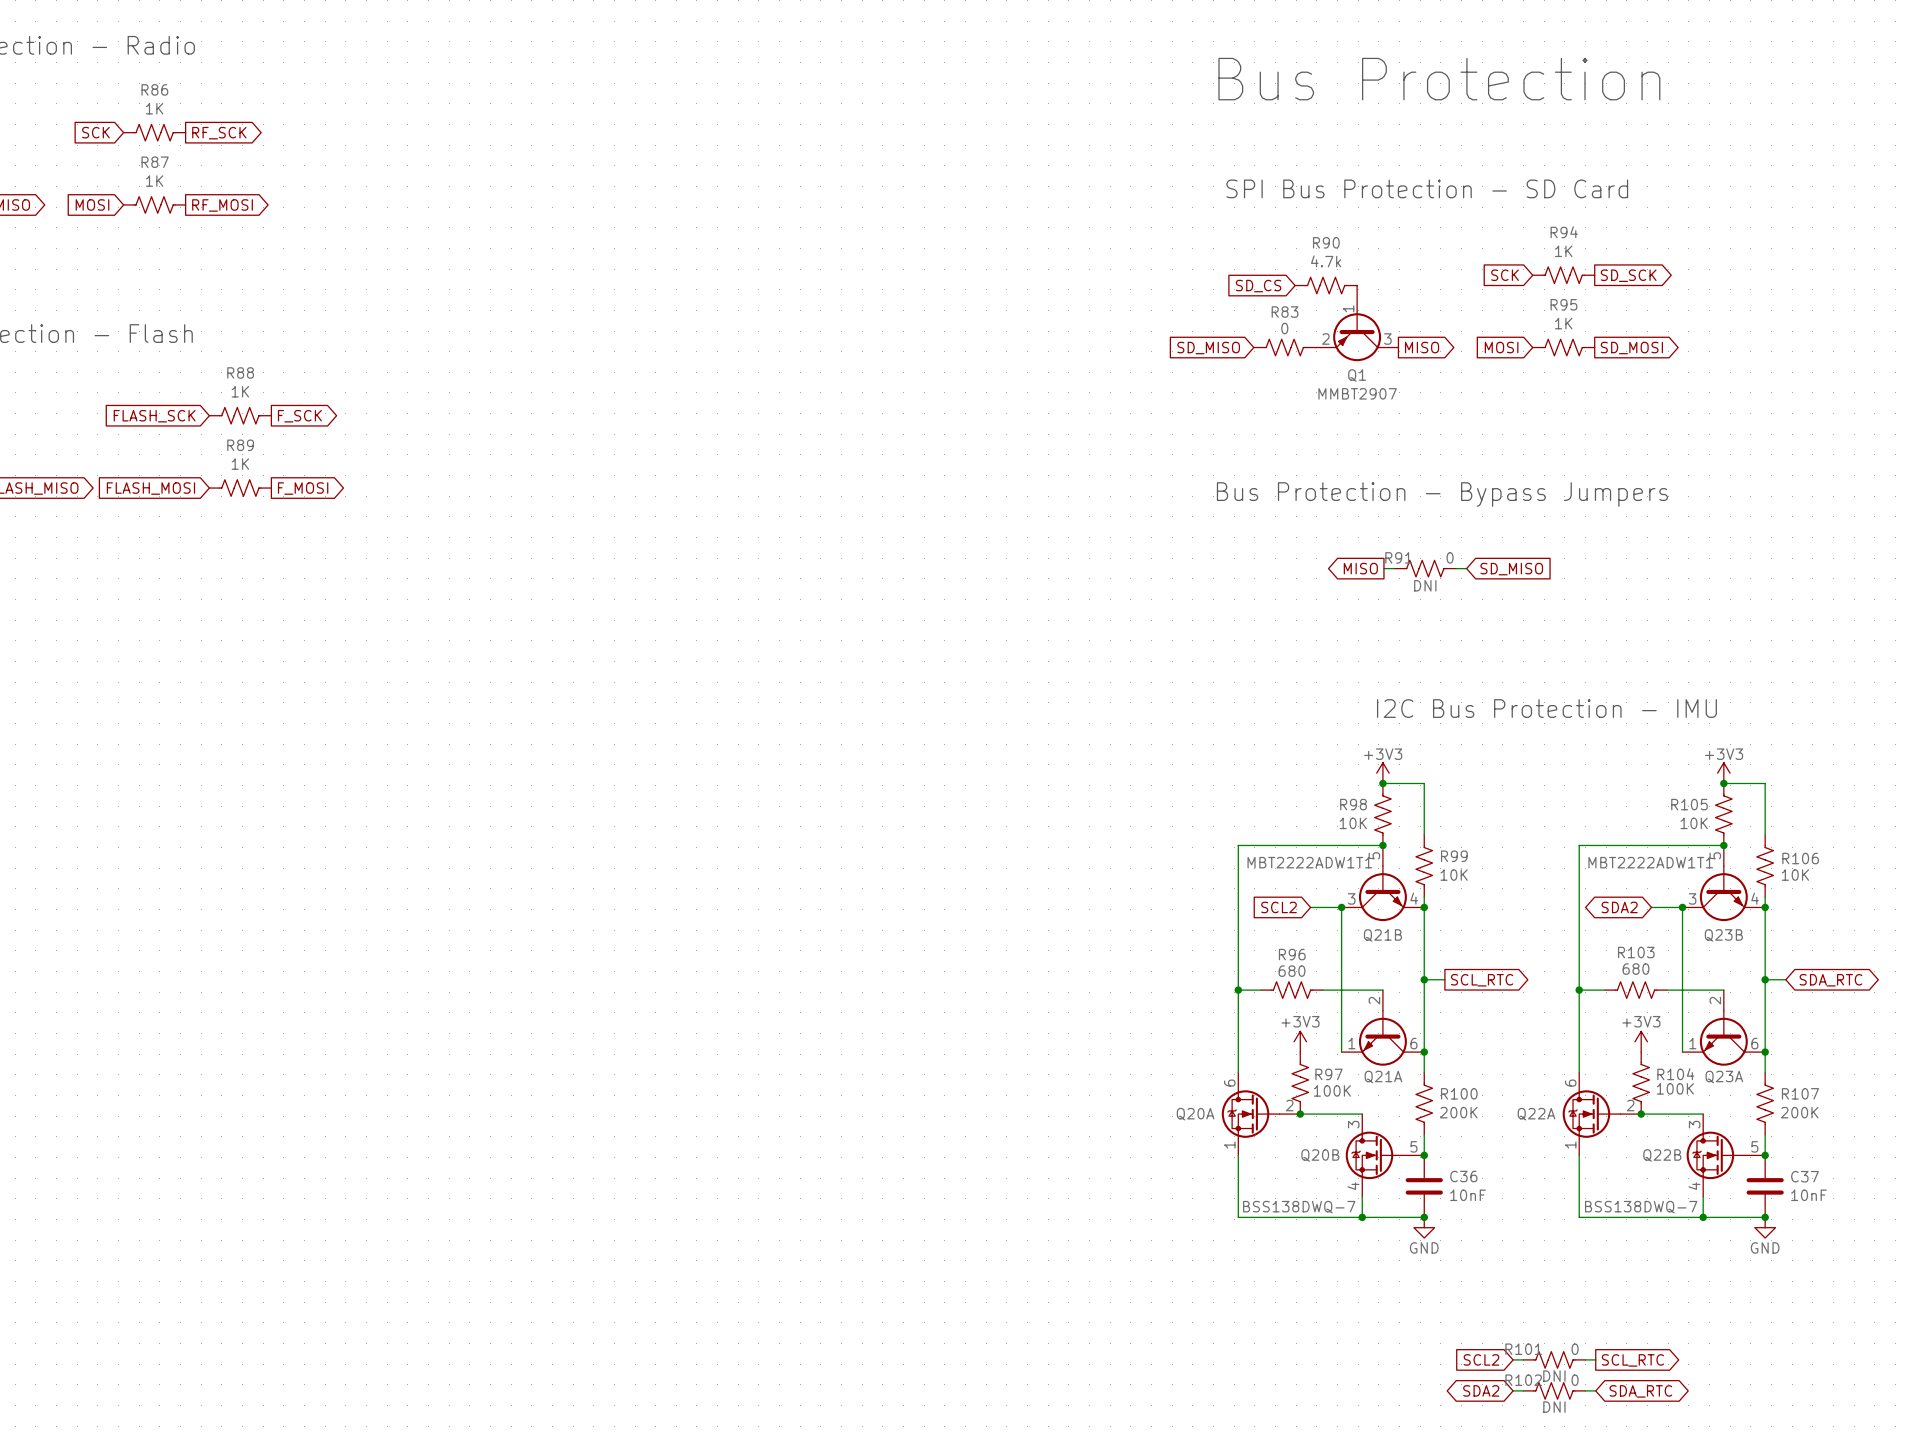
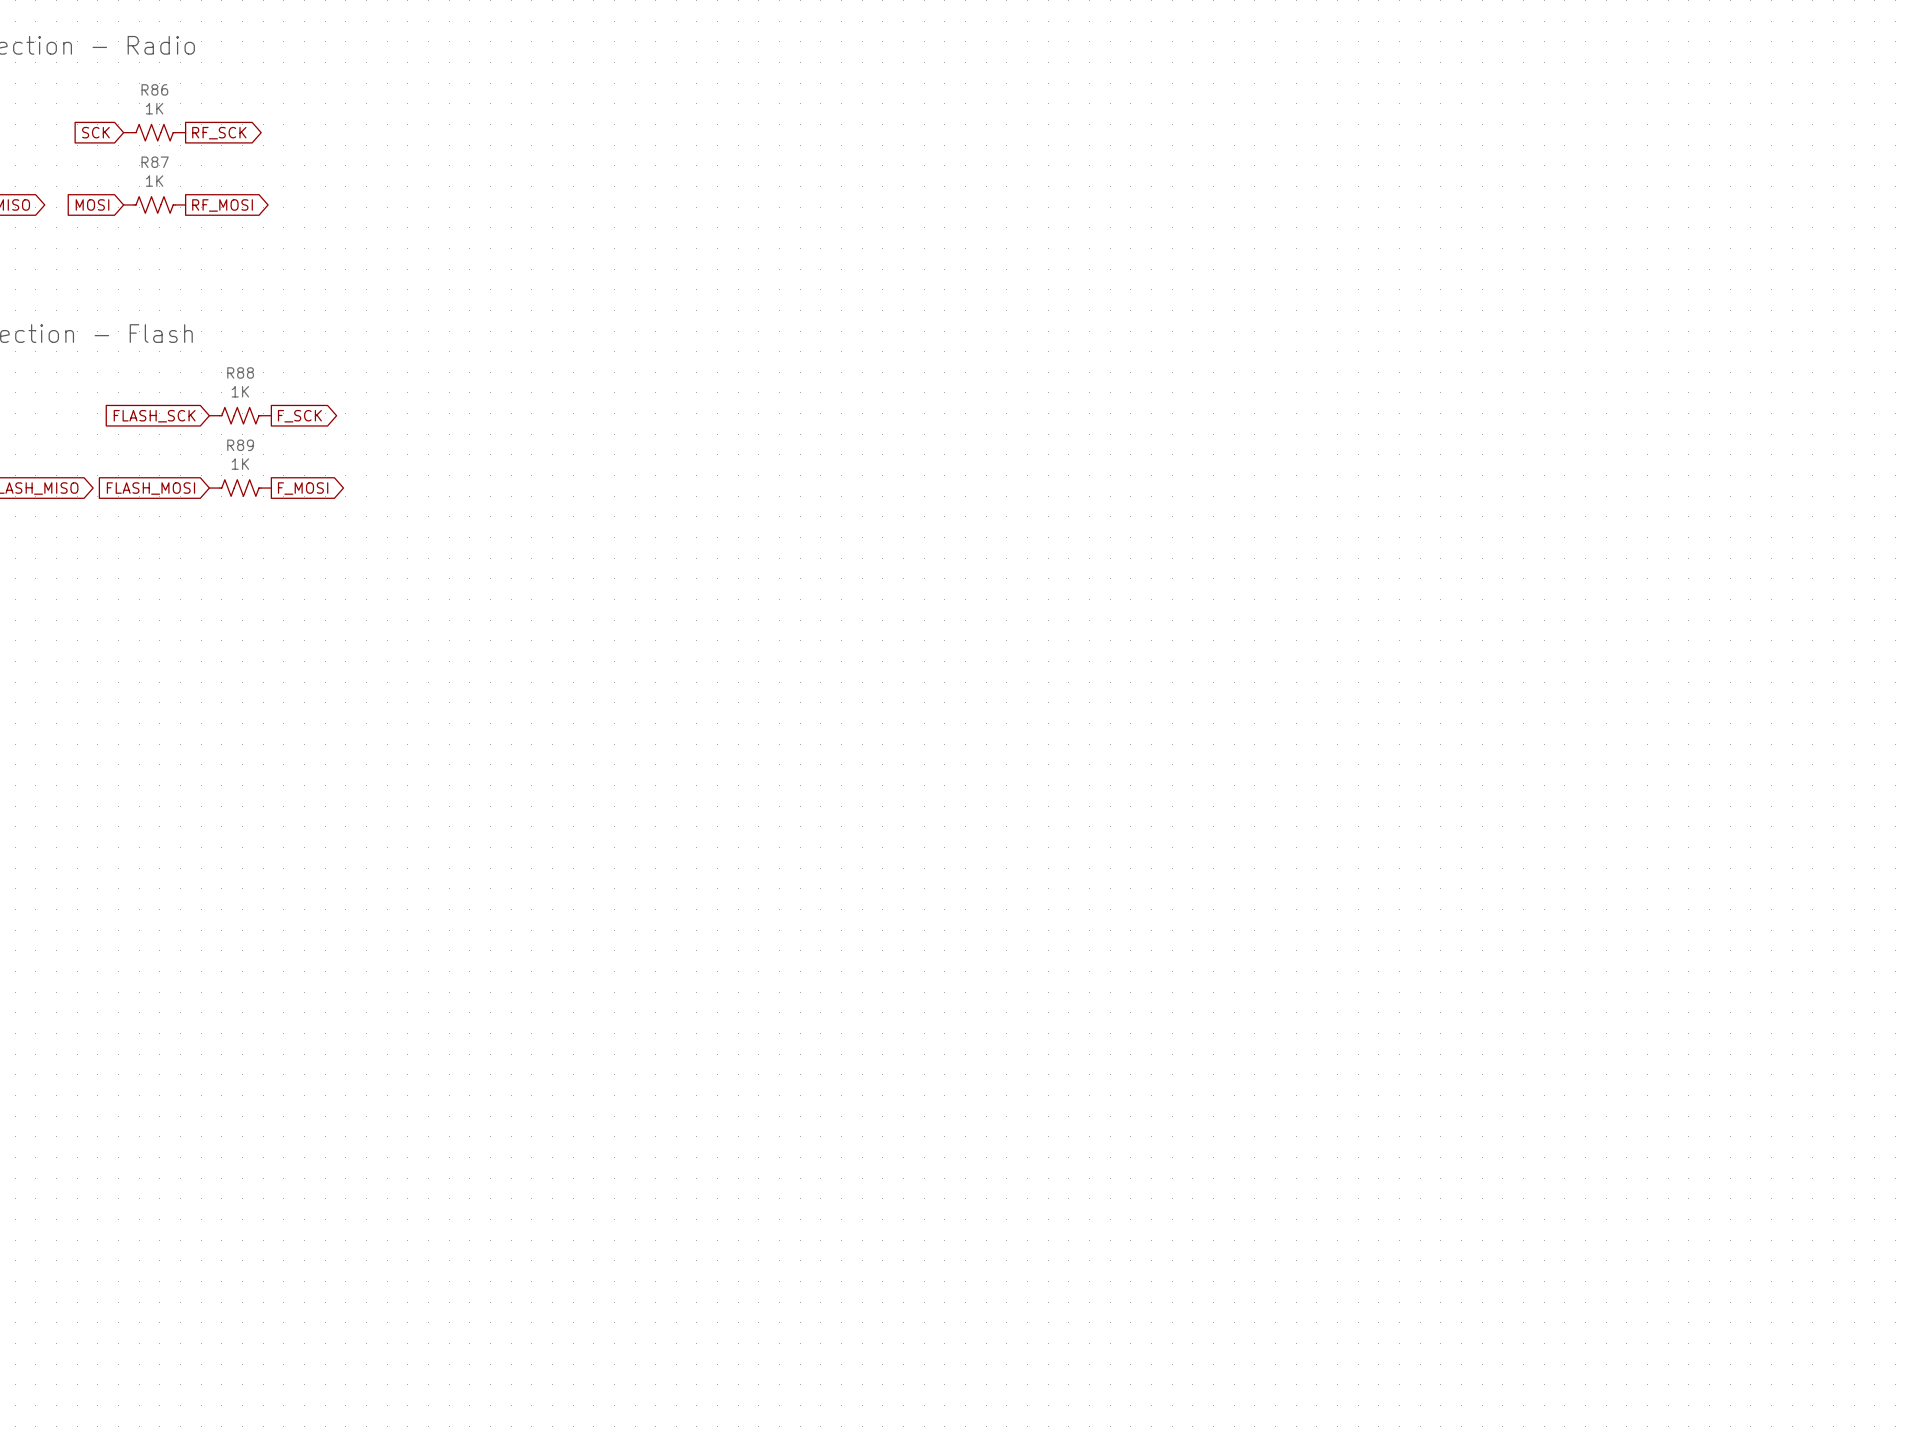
text: Bus Protection (1439, 79) -> none
text: SPI Bus Protection - SD Card (1427, 188) -> none
global label: SCK (1505, 275) -> none
R94: 1K (1563, 275) -> none
global label: SD_SCK (1628, 275) -> none
R90: 4.7k (1326, 285) -> none
global label: SD_CS (1258, 286) -> none
Q1: MMBT2907 (1357, 323) -> none
R83: 0 (1284, 347) -> none
global label: MISO (1422, 347) -> none
global label: MOSI (1501, 347) -> none
R95: 1K (1563, 347) -> none
global label: SD_MISO (1208, 348) -> none
global label: SD_MOSI (1631, 348) -> none
text: Bus Protection - Bypass Jumpers (1442, 494) -> none
global label: MISO (1360, 568) -> none
wire: (1383, 568) (1394, 568) -> none
R91: 0 (1425, 568) -> none
wire: (1456, 568) (1466, 568) -> none
global label: SD_MISO (1511, 569) -> none
text: I2C Bus Protection - IMU (1546, 708) -> none
power symbol: +3V3 (1382, 773) -> none
power symbol: +3V3 (1723, 773) -> none
wire: (1382, 783) (1424, 783) (1424, 835) -> none
junction: (1382, 783) -> none
wire: (1723, 783) (1765, 783) (1765, 835) -> none
junction: (1723, 783) -> none
R98: 10K (1382, 814) -> none
R105: 10K (1723, 814) -> none
wire: (1382, 845) (1238, 845) (1238, 1072) -> none
junction: (1382, 845) -> none
wire: (1723, 845) (1579, 845) (1579, 1072) -> none
junction: (1723, 845) -> none
R99: 10K (1424, 866) -> none
R106: 10K (1765, 866) -> none
Q21B: MBT2222ADW1T1 (1382, 883) -> none
Q23B: MBT2222ADW1T1 (1723, 883) -> none
wire: (1424, 897) (1424, 1072) -> none
wire: (1765, 897) (1765, 1072) -> none
global label: SCL2 (1278, 907) -> none
wire: (1310, 907) (1341, 907) (1341, 1052) -> none
junction: (1341, 907) -> none
junction: (1424, 907) -> none
global label: SDA2 (1619, 907) -> none
wire: (1651, 907) (1682, 907) (1682, 1052) -> none
junction: (1682, 907) -> none
junction: (1765, 907) -> none
wire: (1424, 979) (1444, 979) -> none
junction: (1424, 979) -> none
wire: (1765, 979) (1785, 979) -> none
junction: (1765, 979) -> none
global label: SCL_RTC (1482, 980) -> none
global label: SDA_RTC (1830, 980) -> none
wire: (1238, 990) (1261, 990) -> none
junction: (1238, 990) -> none
R96: 680 (1292, 990) -> none
wire: (1323, 990) (1382, 990) -> none
wire: (1579, 990) (1605, 990) -> none
junction: (1579, 990) -> none
R103: 680 (1636, 990) -> none
wire: (1667, 990) (1723, 990) -> none
Q21A: (1382, 1027) -> none
Q23A: (1723, 1027) -> none
power symbol: +3V3 (1300, 1041) -> none
power symbol: +3V3 (1641, 1041) -> none
junction: (1424, 1052) -> none
junction: (1765, 1052) -> none
R97: 100K (1300, 1083) -> none
R104: 100K (1641, 1083) -> none
R100: 200K (1424, 1103) -> none
R107: 200K (1765, 1103) -> none
Q20A: BSS138DWQ-7 (1261, 1114) -> none
wire: (1300, 1114) (1362, 1114) -> none
junction: (1300, 1114) -> none
Q22A: BSS138DWQ-7 (1601, 1114) -> none
wire: (1641, 1114) (1703, 1114) -> none
junction: (1641, 1114) -> none
wire: (1424, 1134) (1424, 1155) -> none
wire: (1765, 1134) (1765, 1155) -> none
wire: (1238, 1155) (1238, 1217) (1424, 1217) -> none
Q20B: (1385, 1155) -> none
junction: (1424, 1155) -> none
wire: (1579, 1155) (1579, 1217) (1765, 1217) -> none
Q22B: (1725, 1155) -> none
junction: (1765, 1155) -> none
C36: 10nF (1424, 1186) -> none
C37: 10nF (1765, 1186) -> none
wire: (1362, 1196) (1362, 1217) -> none
wire: (1703, 1196) (1703, 1217) -> none
junction: (1362, 1217) -> none
junction: (1424, 1217) -> none
junction: (1703, 1217) -> none
junction: (1765, 1217) -> none
power symbol: GND (1424, 1227) -> none
power symbol: GND (1765, 1227) -> none
global label: SCL2 (1481, 1359) -> none
wire: (1513, 1359) (1523, 1359) -> none
R101: 0 (1554, 1359) -> none
wire: (1585, 1359) (1595, 1359) -> none
global label: SCL_RTC (1632, 1360) -> none
global label: SDA2 (1481, 1390) -> none
wire: (1513, 1390) (1523, 1390) -> none
R102: 0 (1554, 1390) -> none
wire: (1585, 1390) (1595, 1390) -> none
global label: SDA_RTC (1640, 1391) -> none

